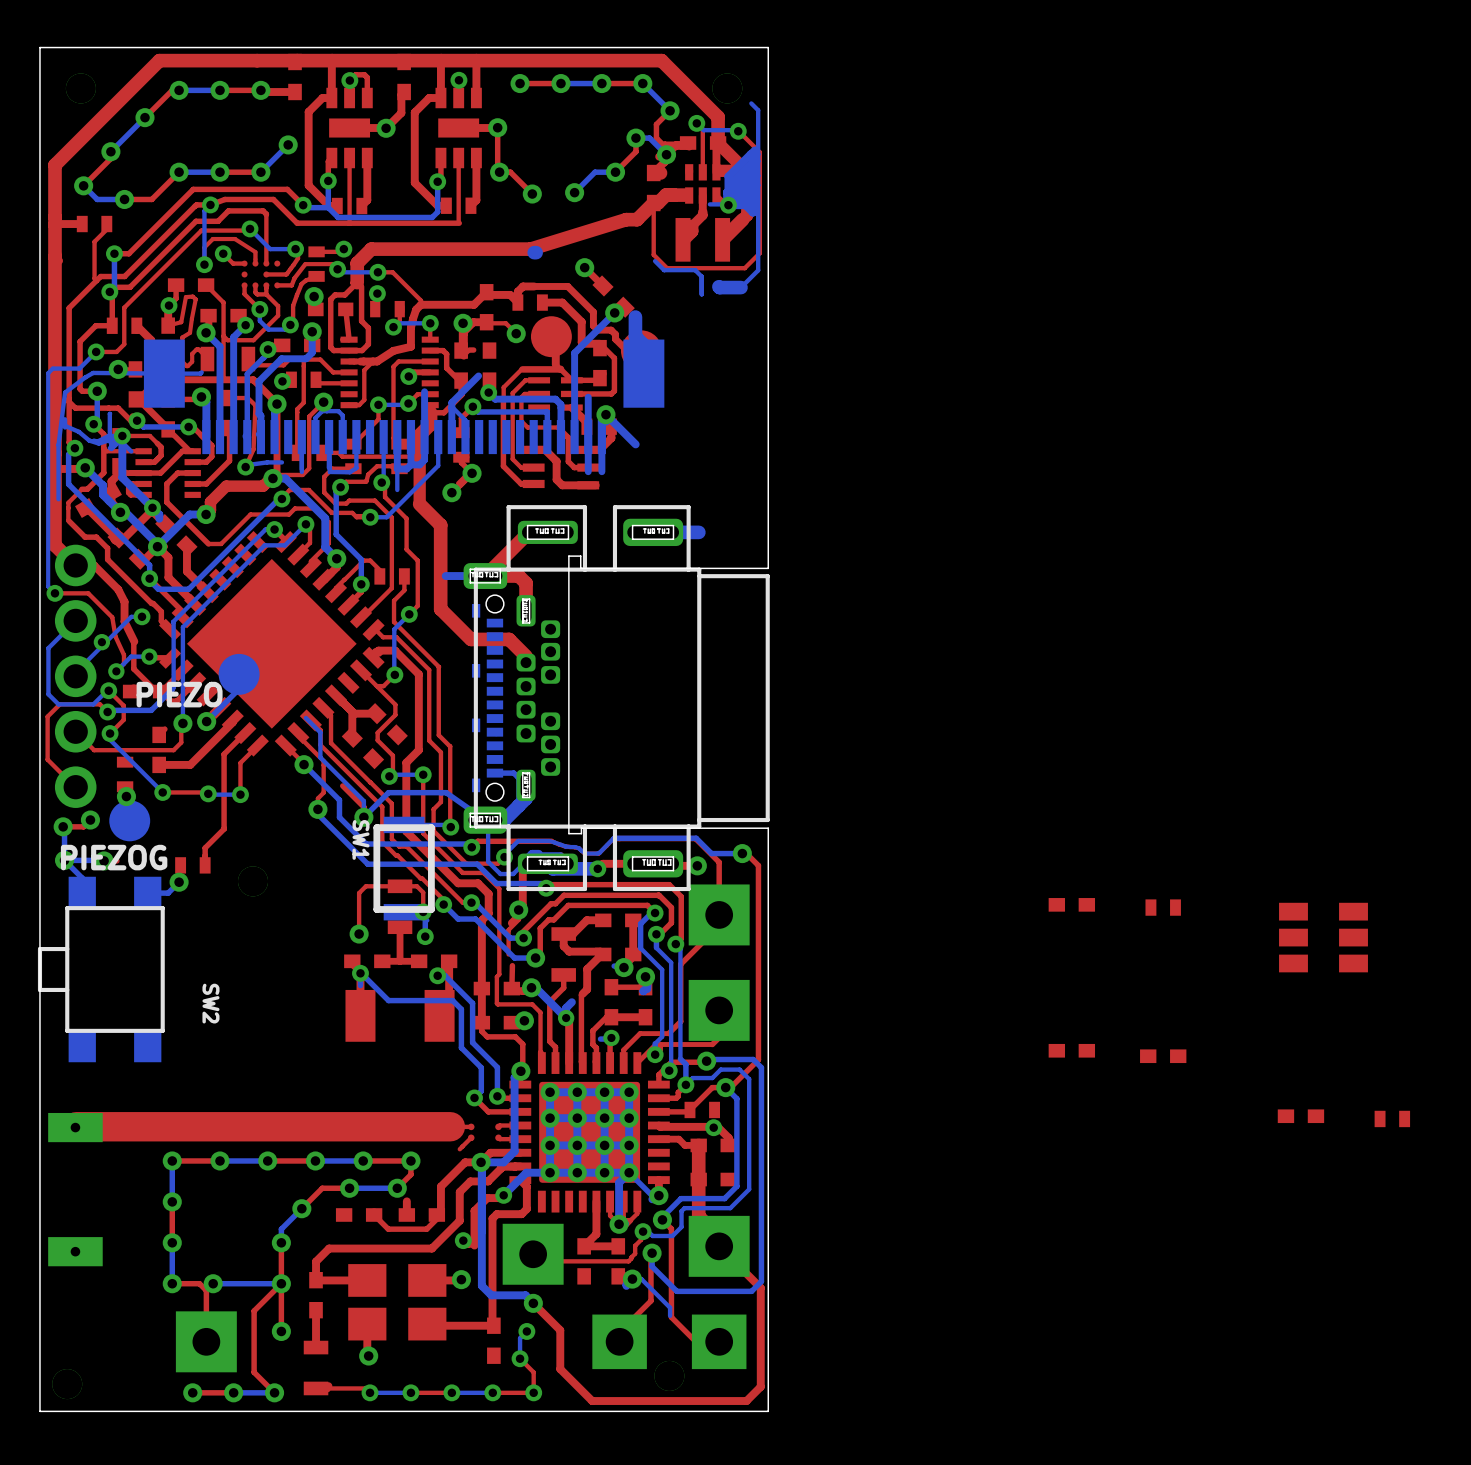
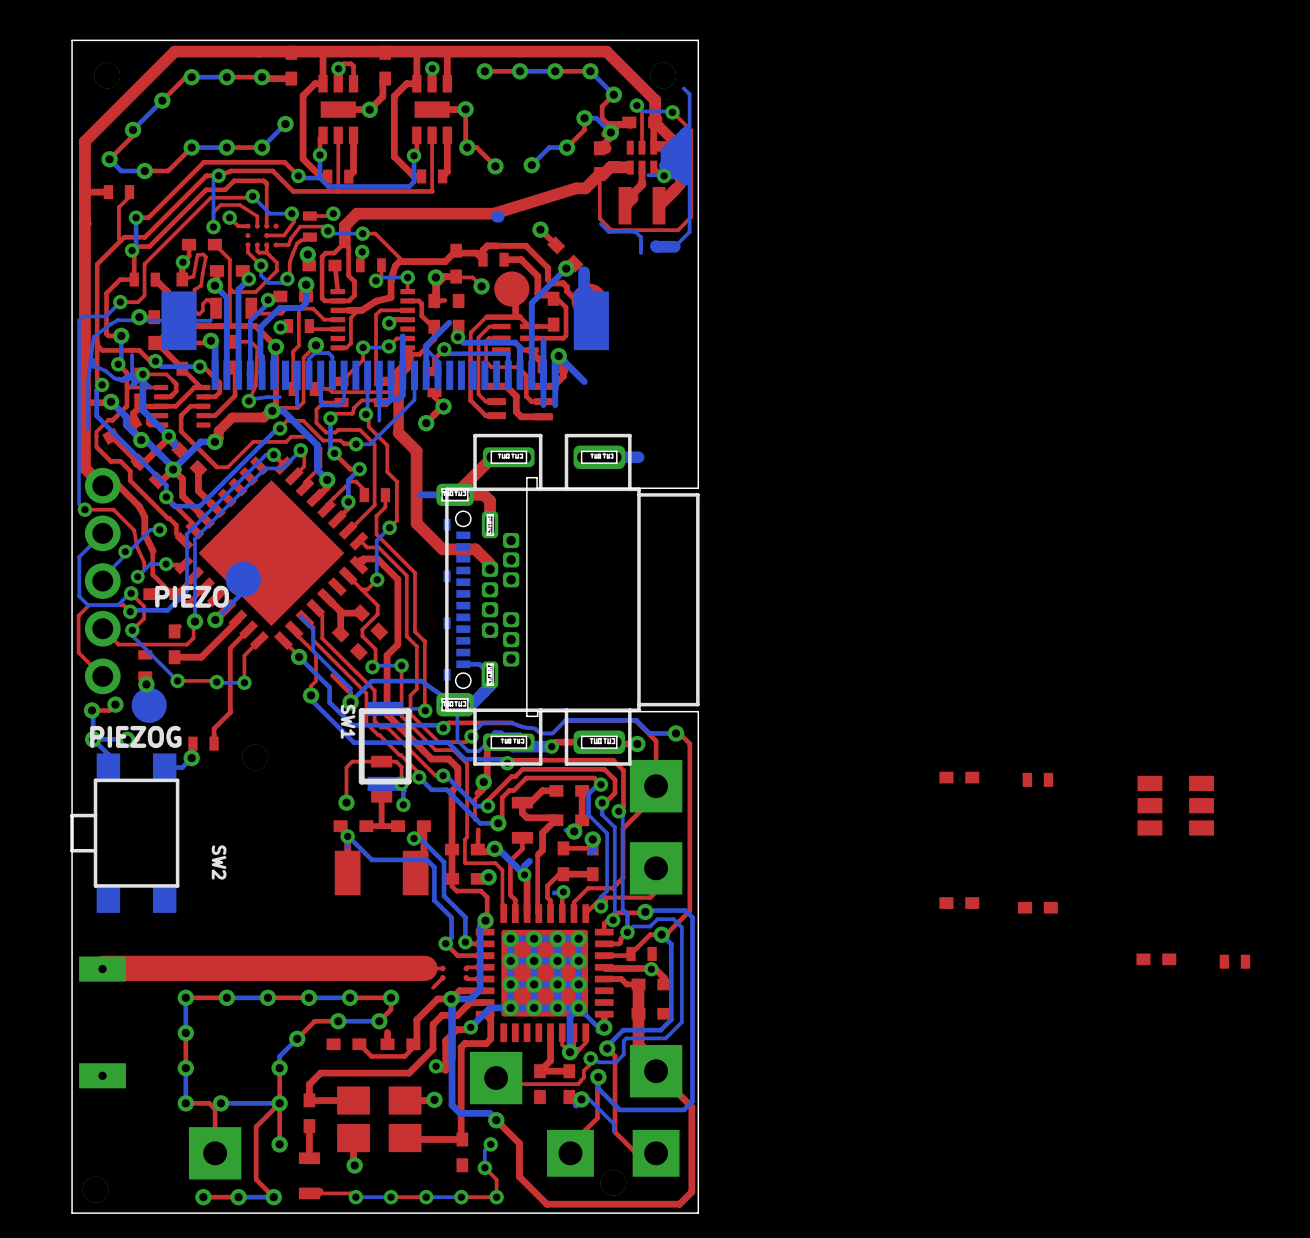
bottom track: (339, 488) (336, 491) (336, 534) (361, 559) -> (359, 469) (348, 480)
bottom track: none -> (330, 419) (330, 449) (334, 453)
top track: none -> (334, 453) (350, 469) (359, 469)
via: none -> (334, 453)
via: none -> (359, 469)

